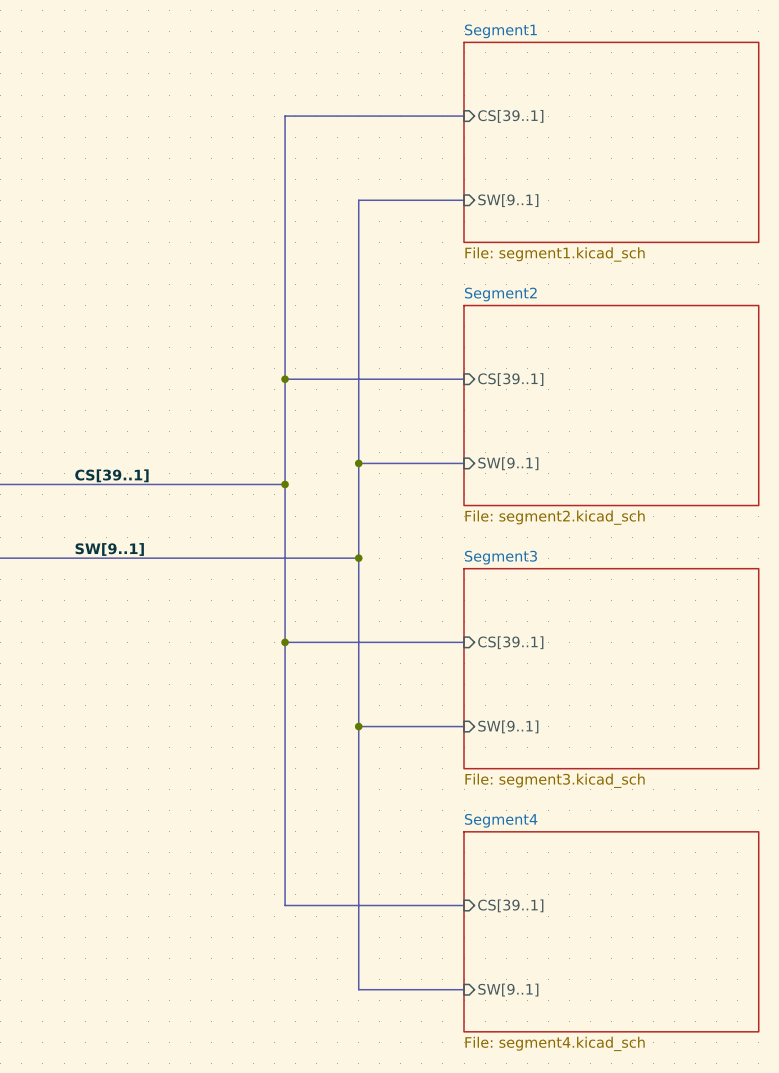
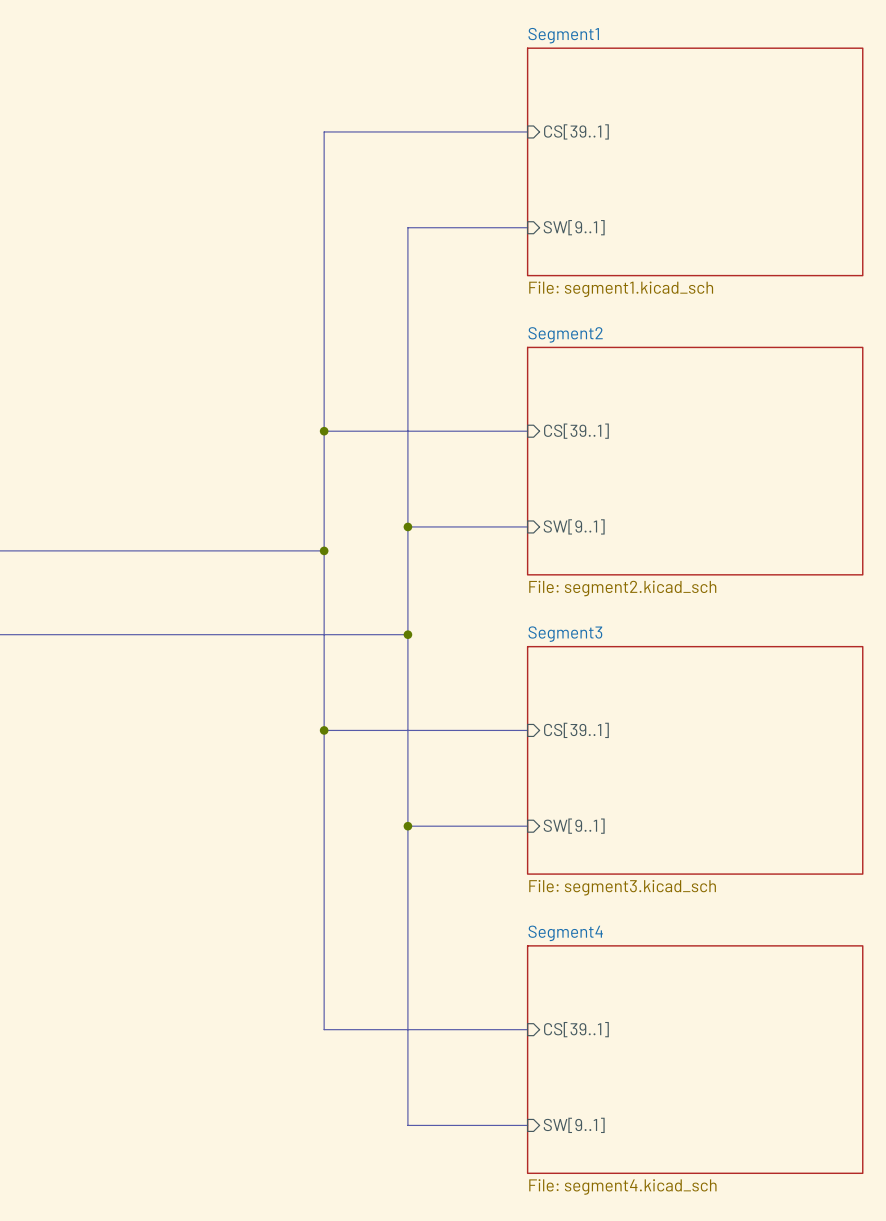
label: CS[39..1] (111, 475) -> none
label: SW[9..1] (109, 549) -> none

